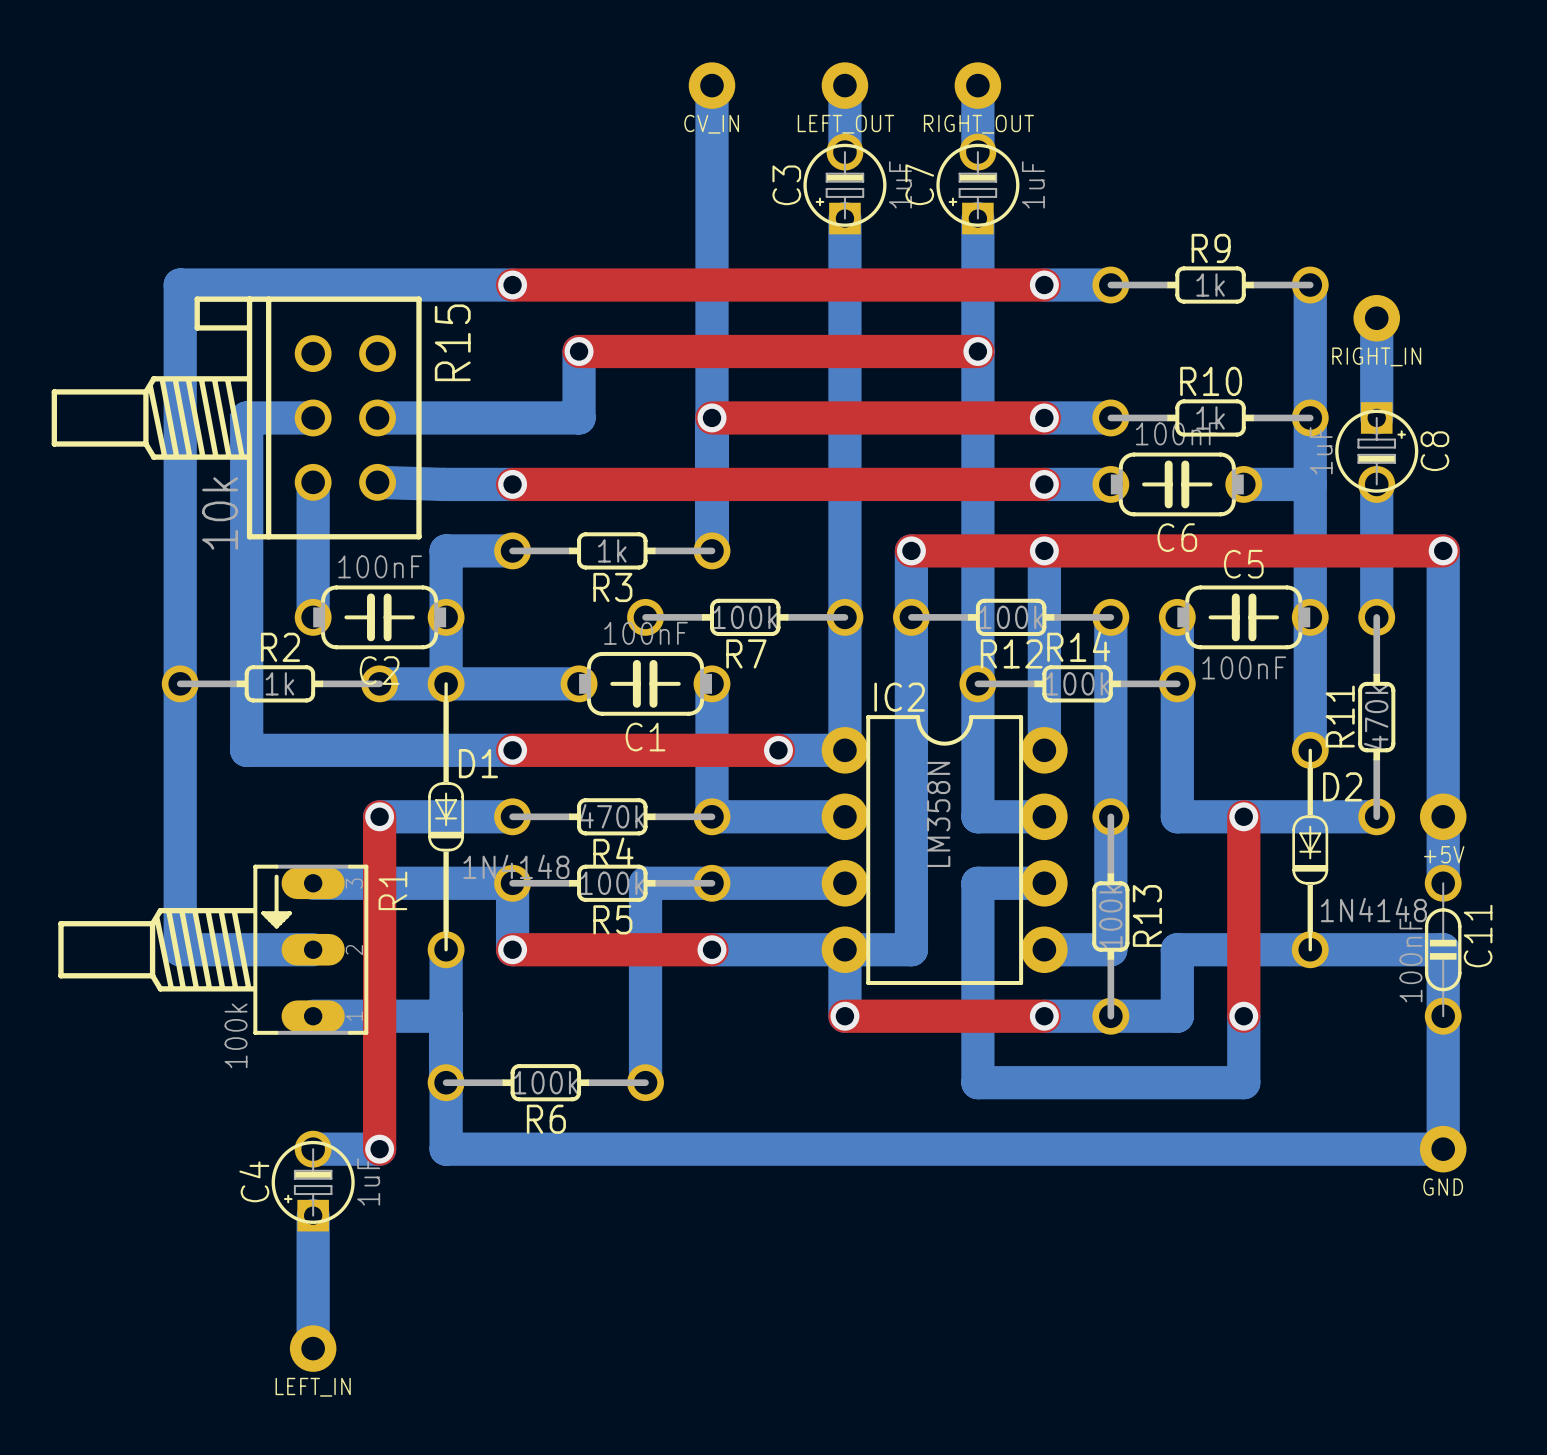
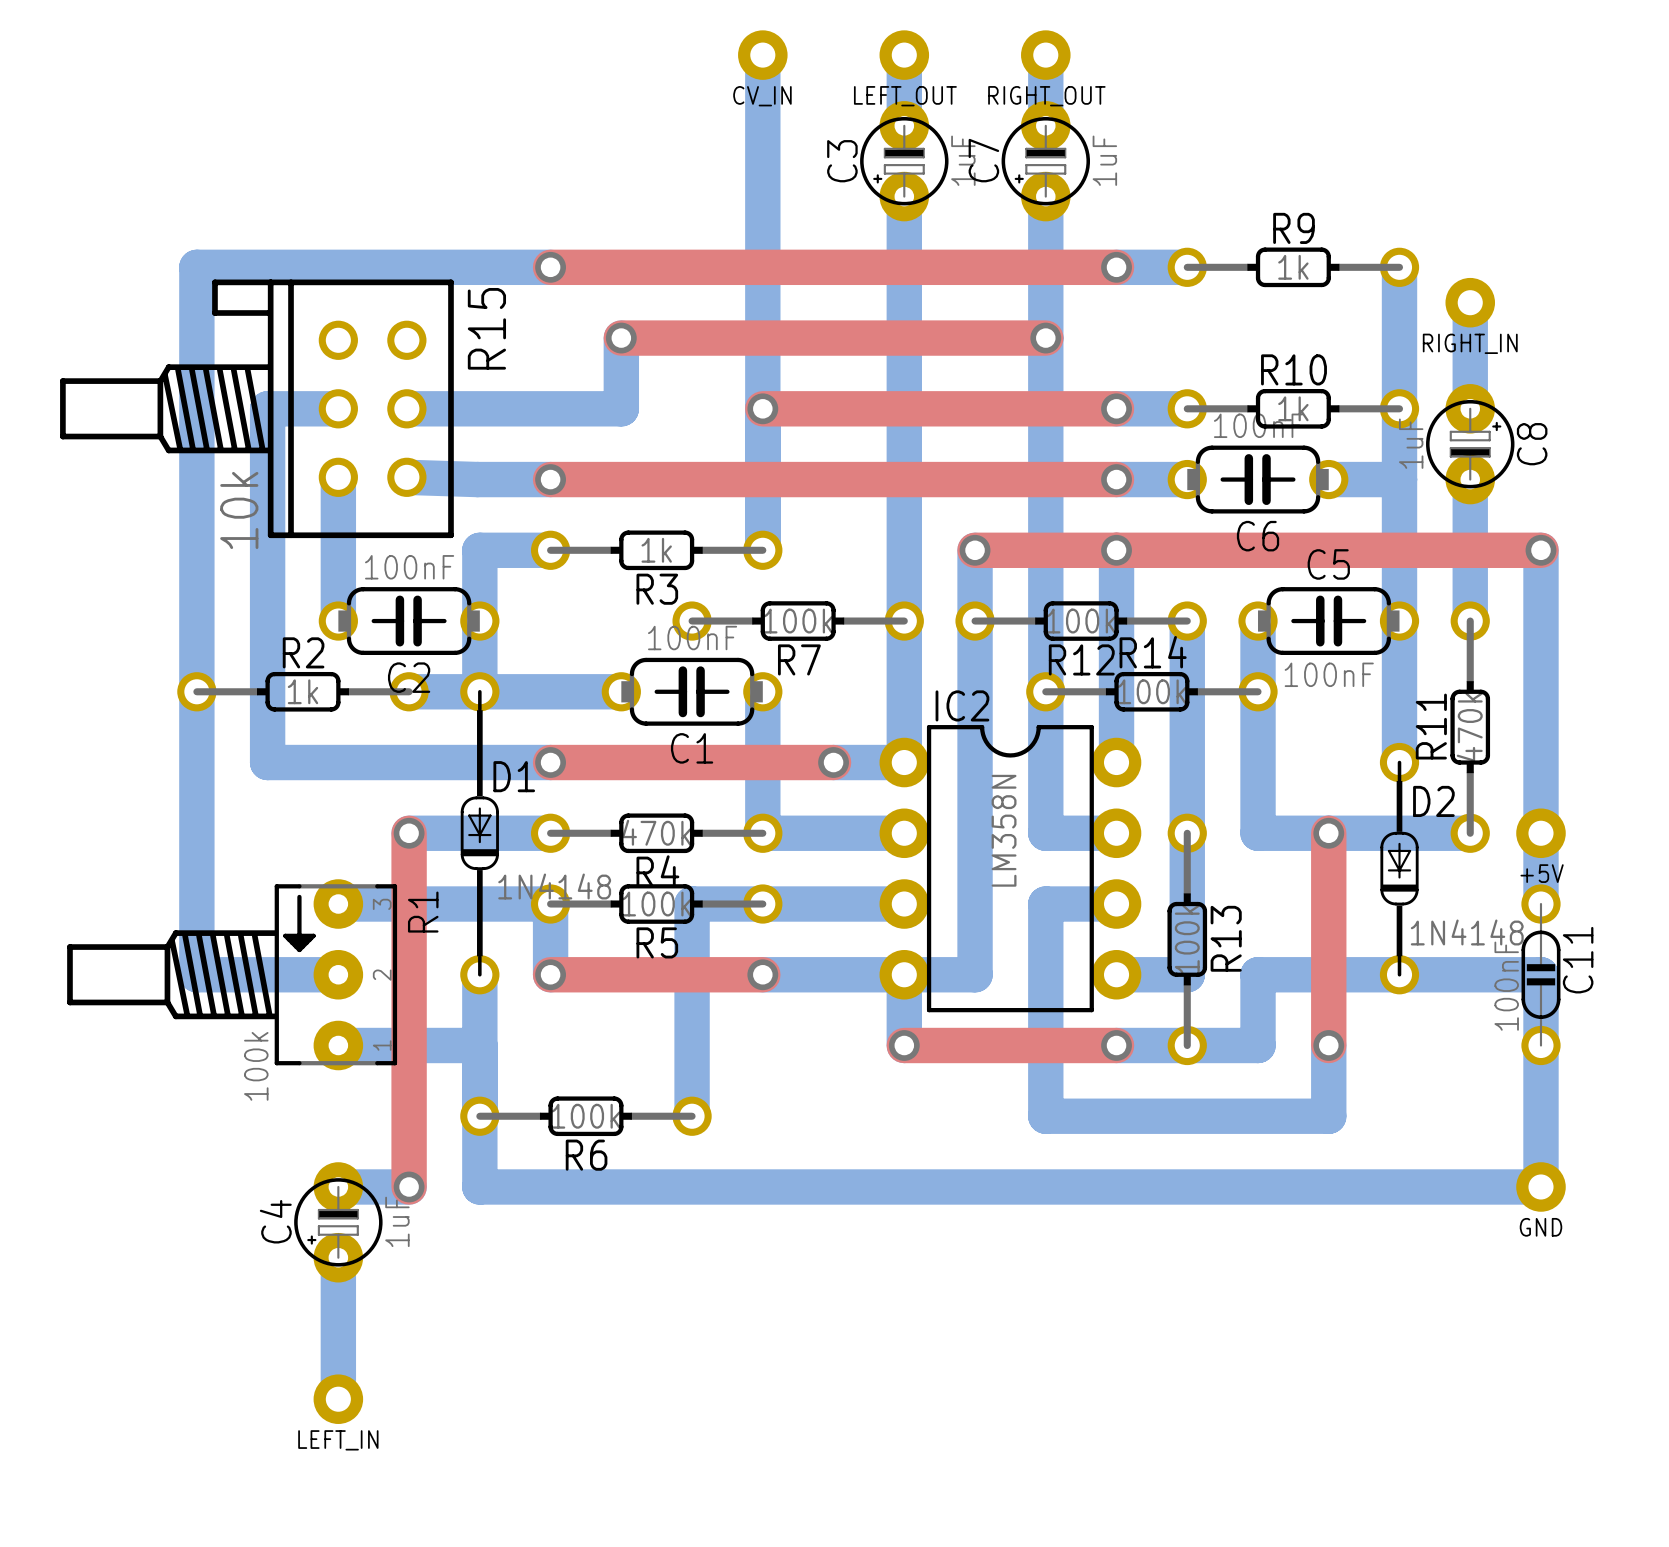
C3 footprint: [803, 133, 887, 235] -> [860, 101, 949, 222]
C7 footprint: [936, 133, 1020, 235] -> [1001, 101, 1091, 222]
C8 footprint: [1335, 402, 1419, 503] -> [1426, 384, 1515, 505]
R1 footprint: [58, 864, 369, 1035] -> [67, 879, 398, 1071]
C4 footprint: [271, 1130, 355, 1232] -> [294, 1162, 383, 1283]

